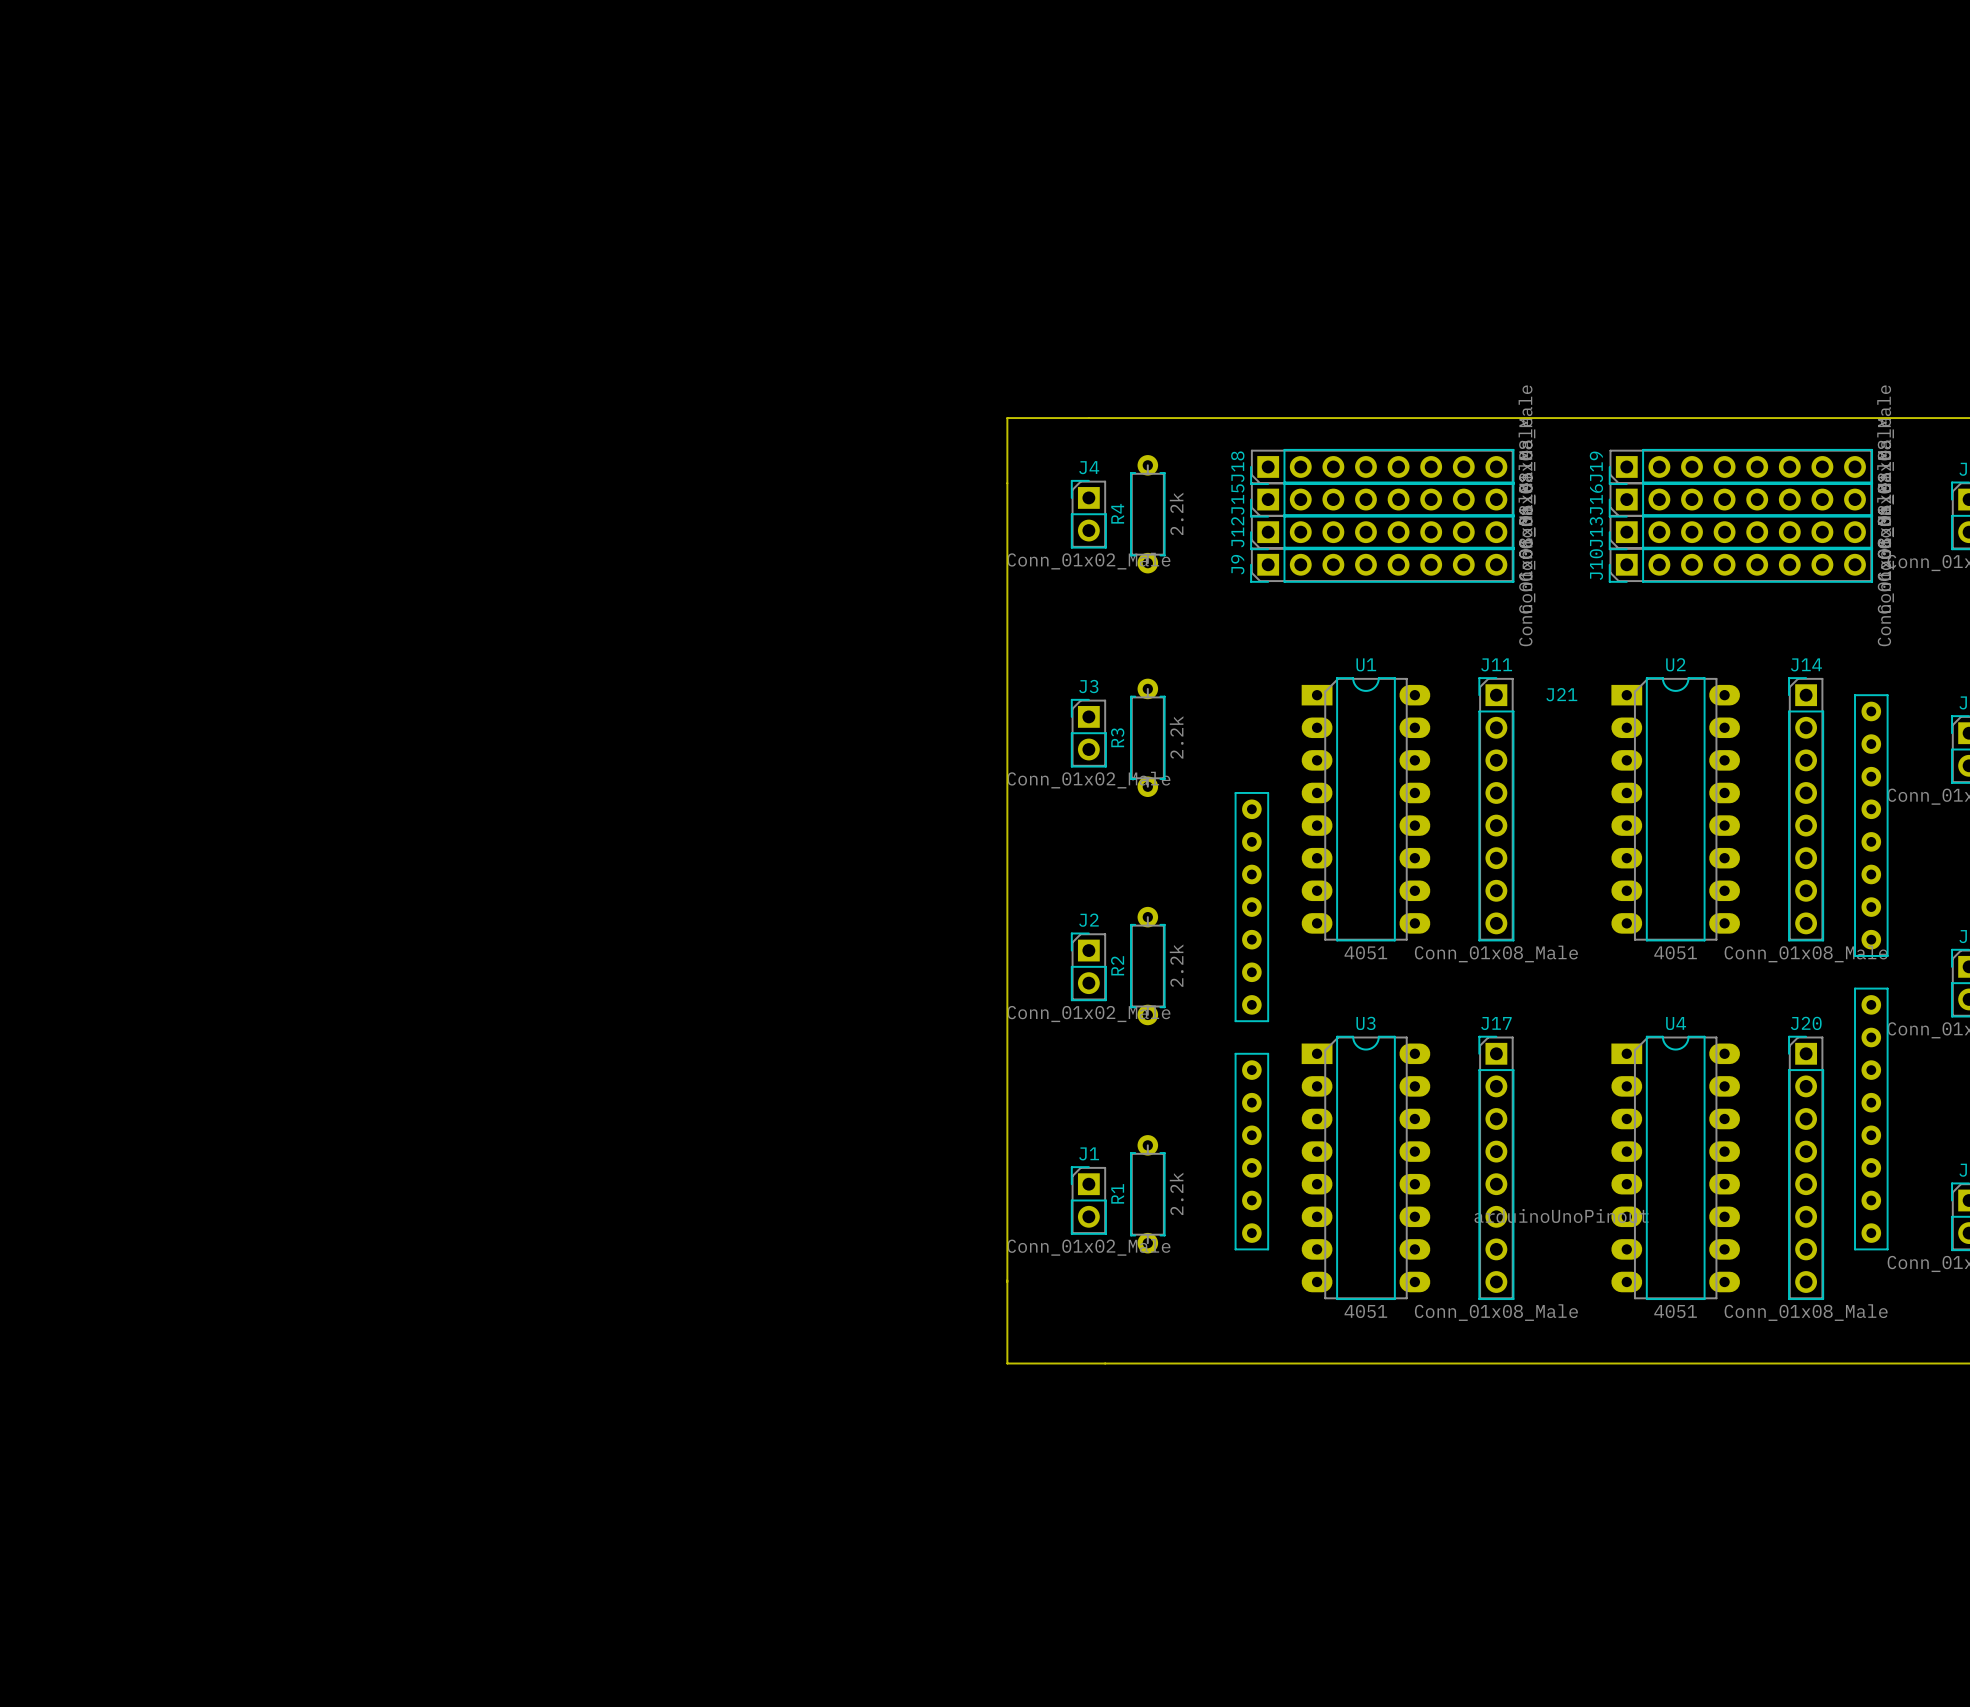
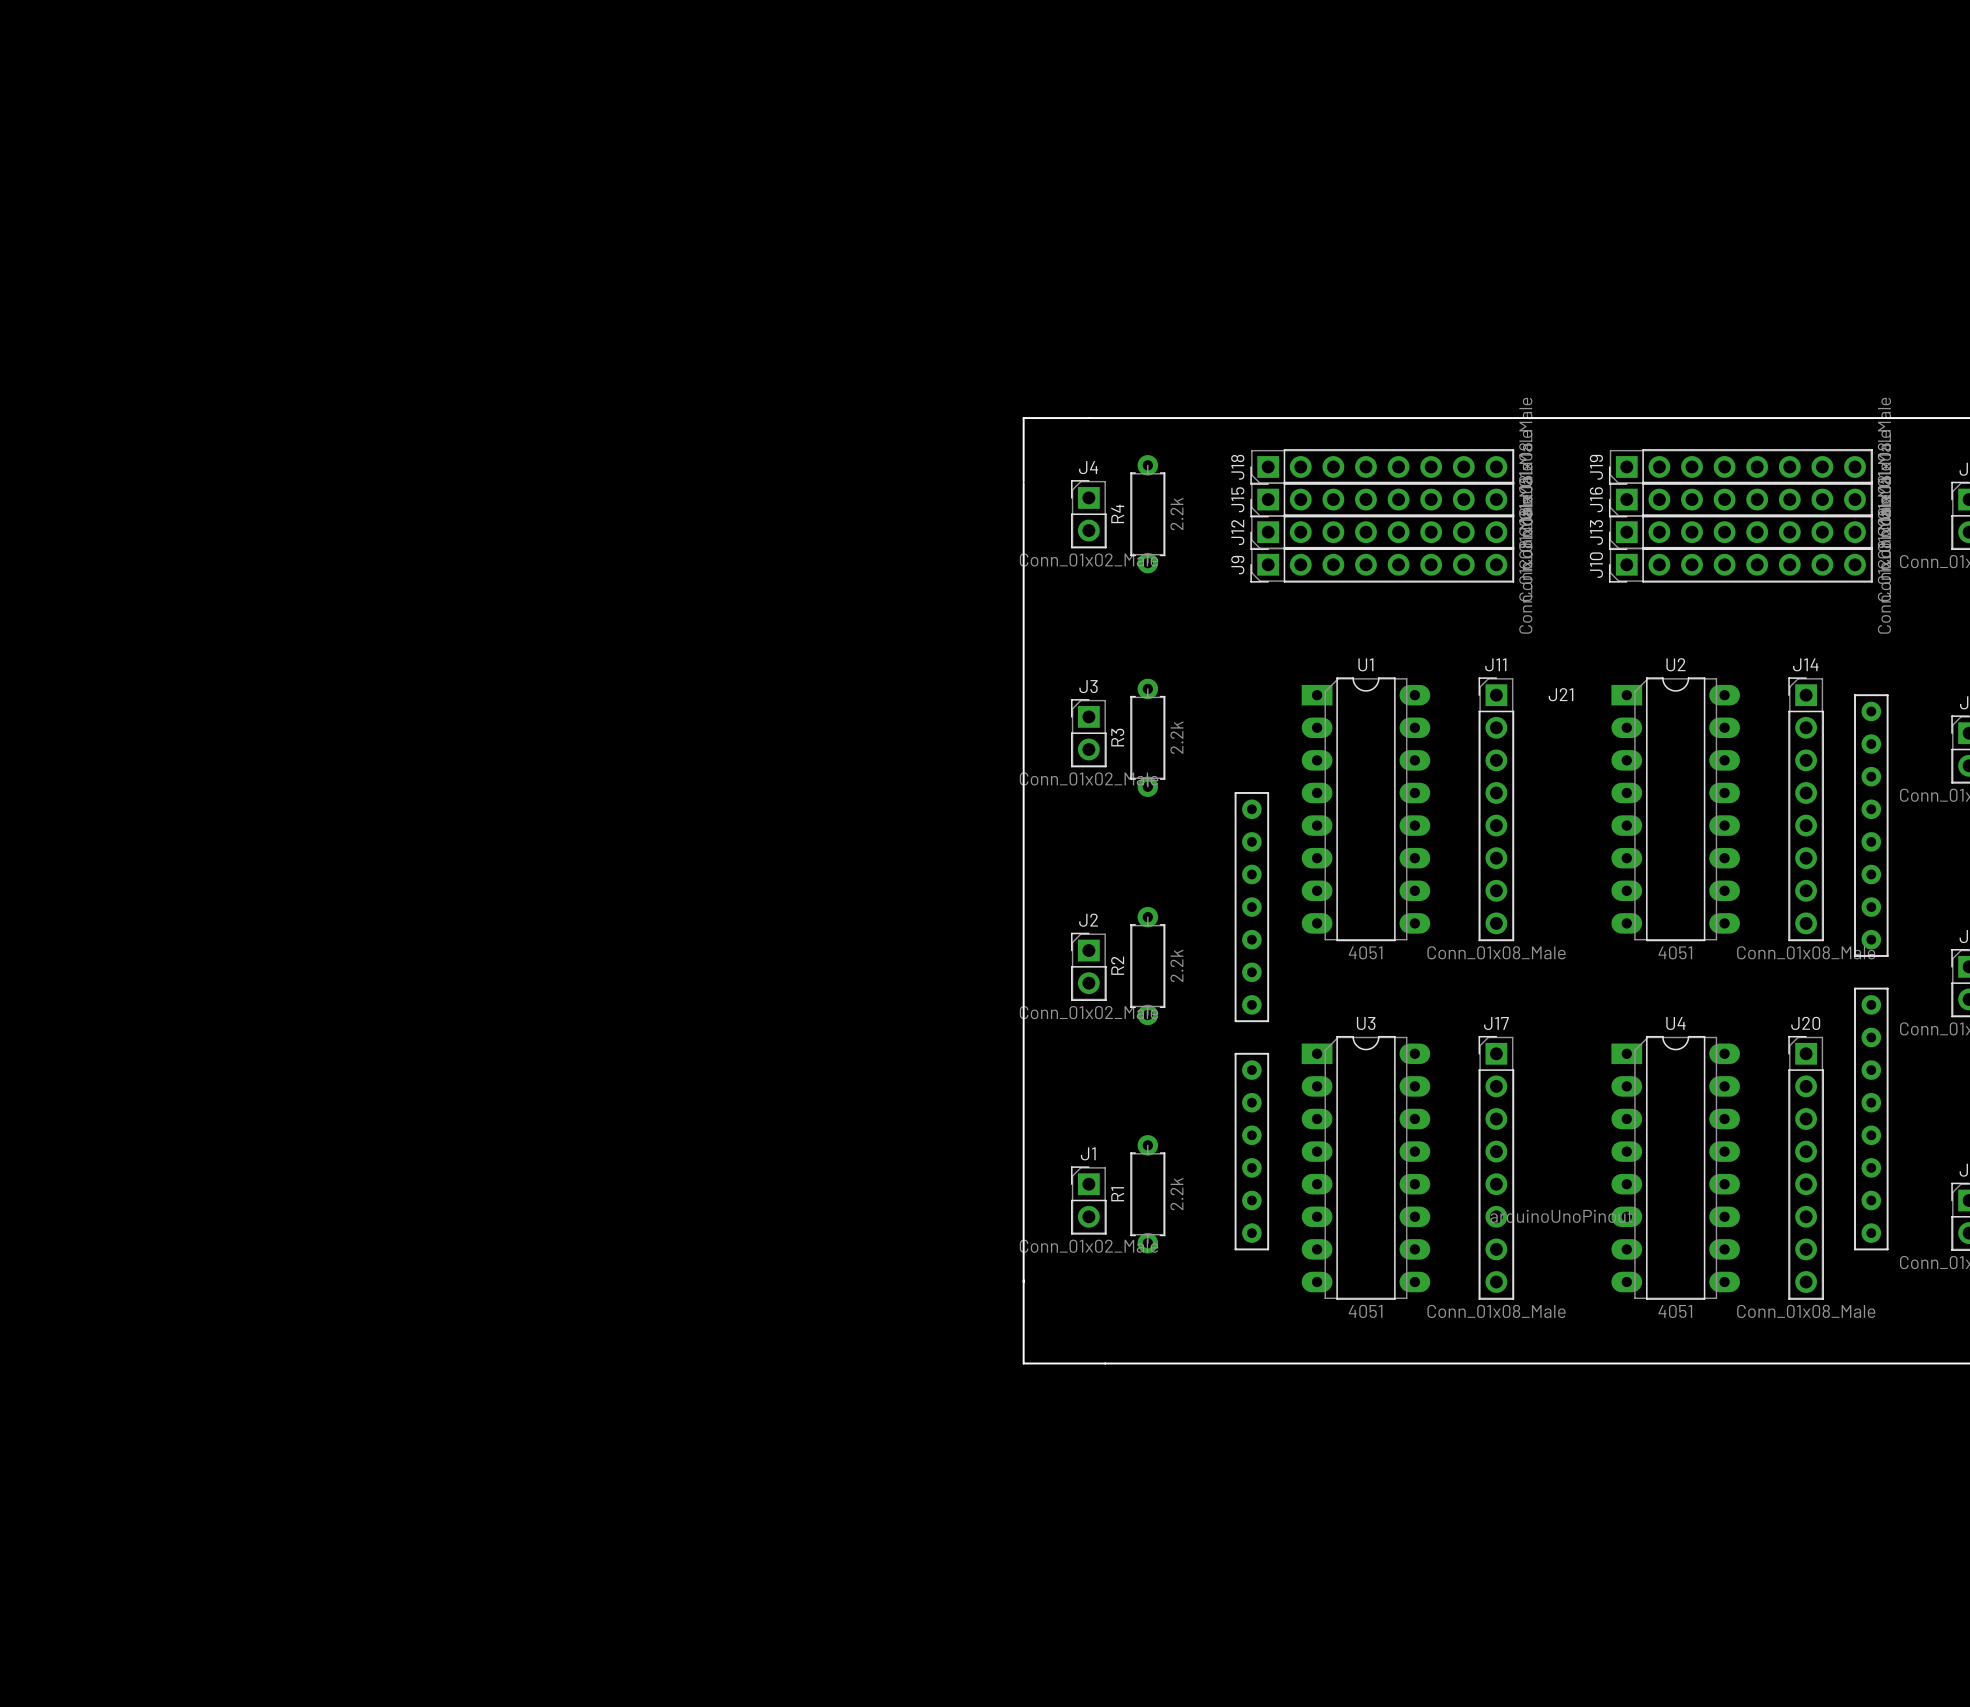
board edge: (1023, 418) (1007, 418) (1007, 1363) (1023, 1363) -> (1023, 483) (1023, 1363)
board edge: none -> (1023, 418) (1023, 481)

